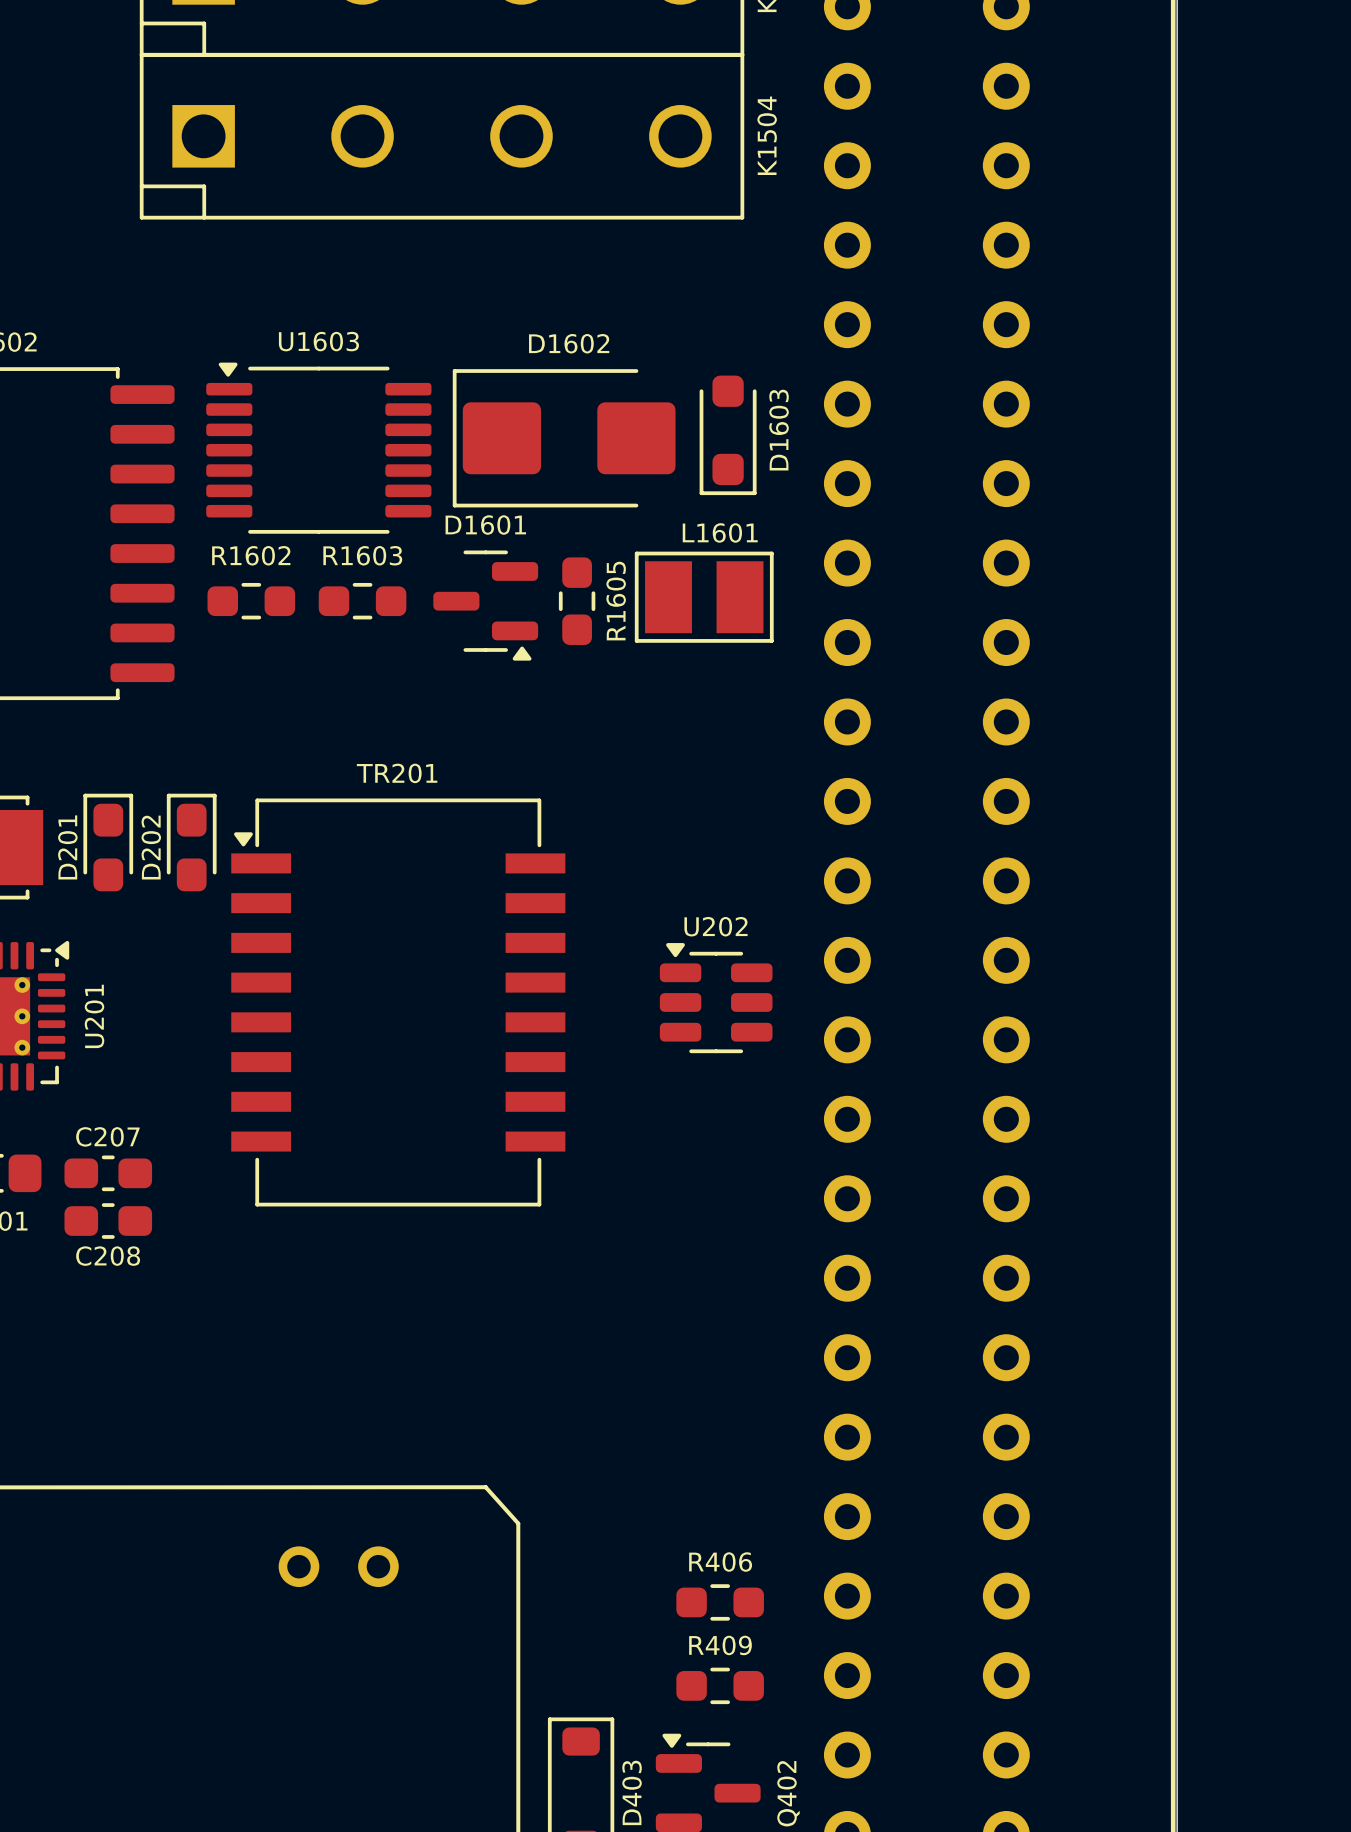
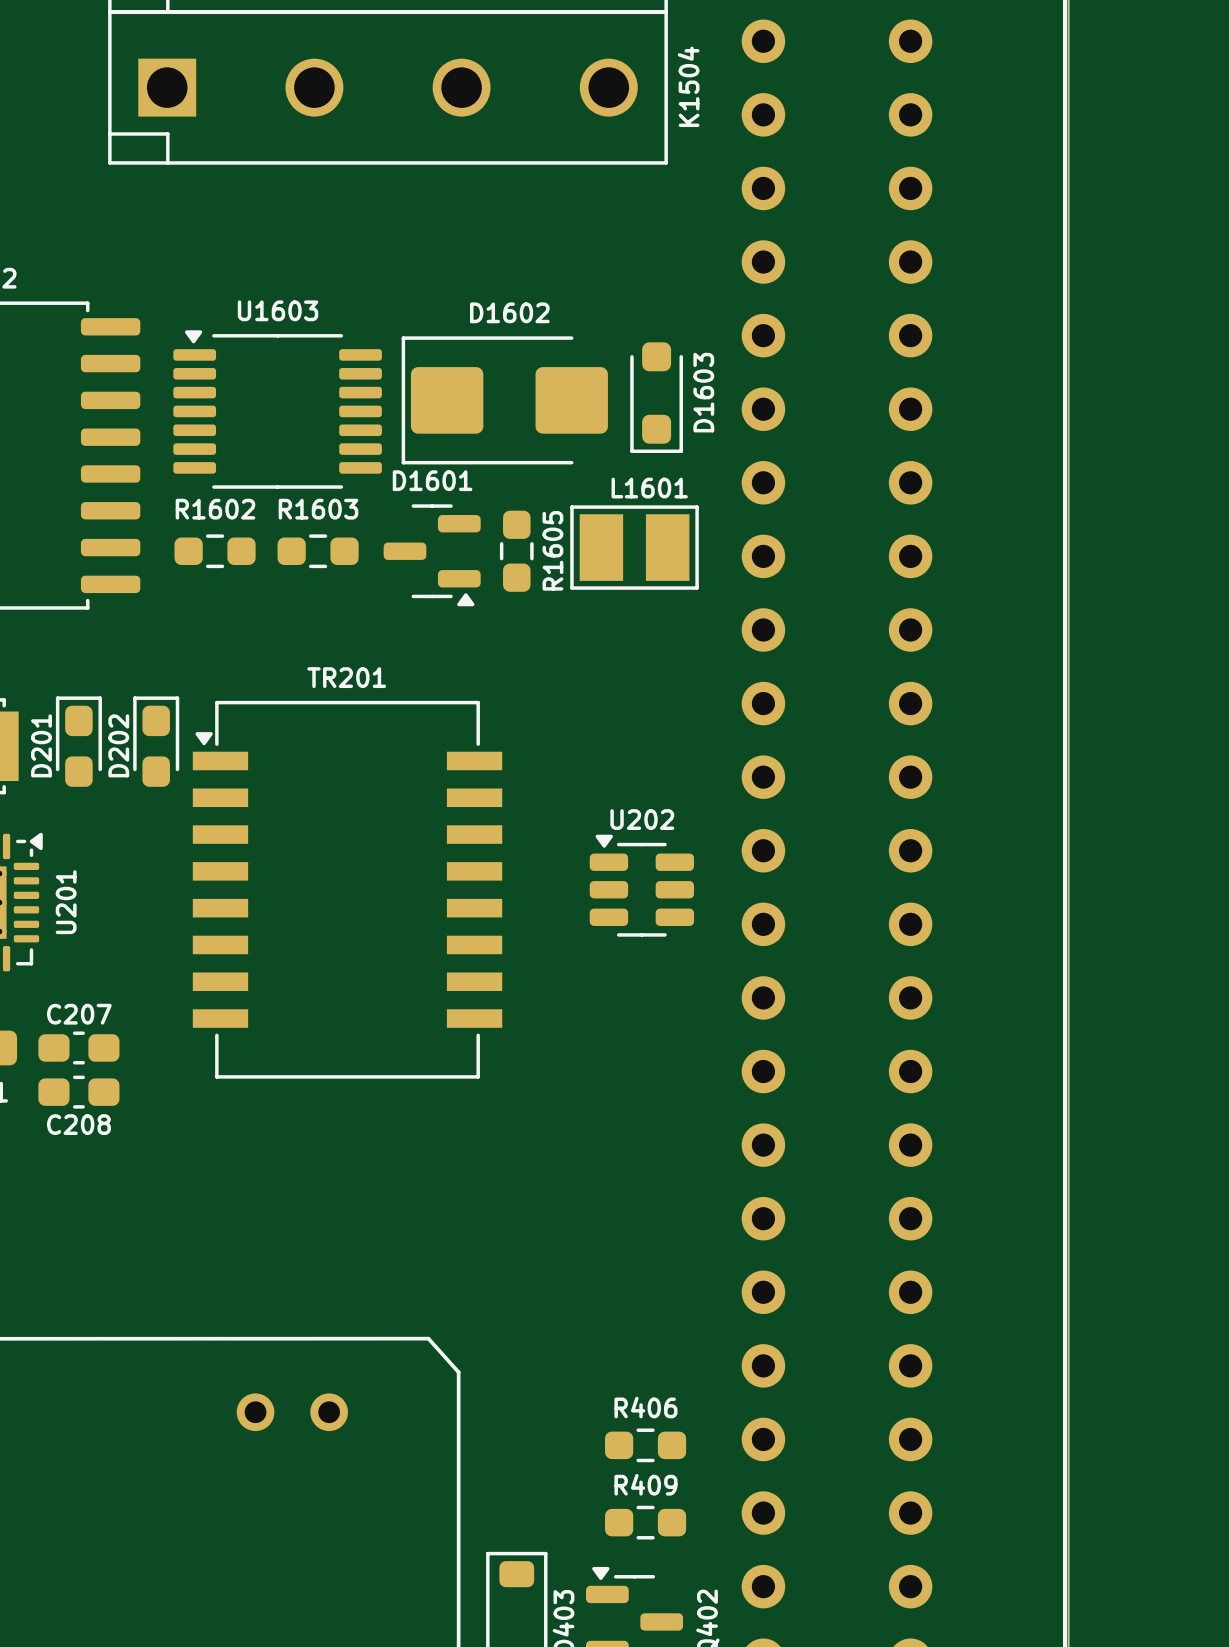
D1603 position: (728, 435) -> (656, 397)
D1602 position: (564, 438) -> (504, 400)
U1603 position: (318, 448) -> (277, 409)
L1601 position: (704, 597) -> (634, 547)
R1602 position: (251, 601) -> (215, 551)
R1603 position: (362, 601) -> (318, 551)
R1605 position: (577, 601) -> (516, 551)
D1601 position: (485, 605) -> (432, 555)

